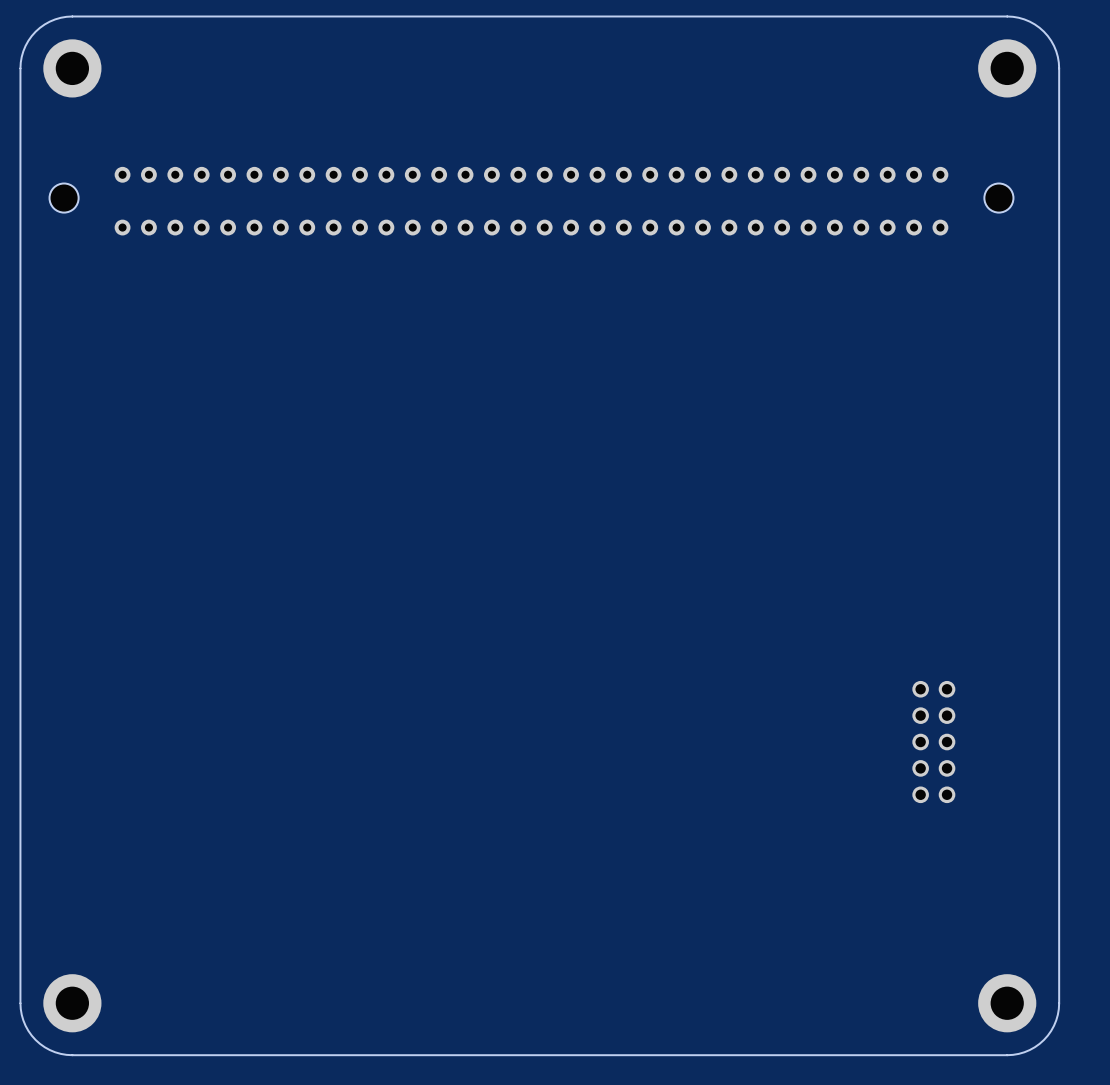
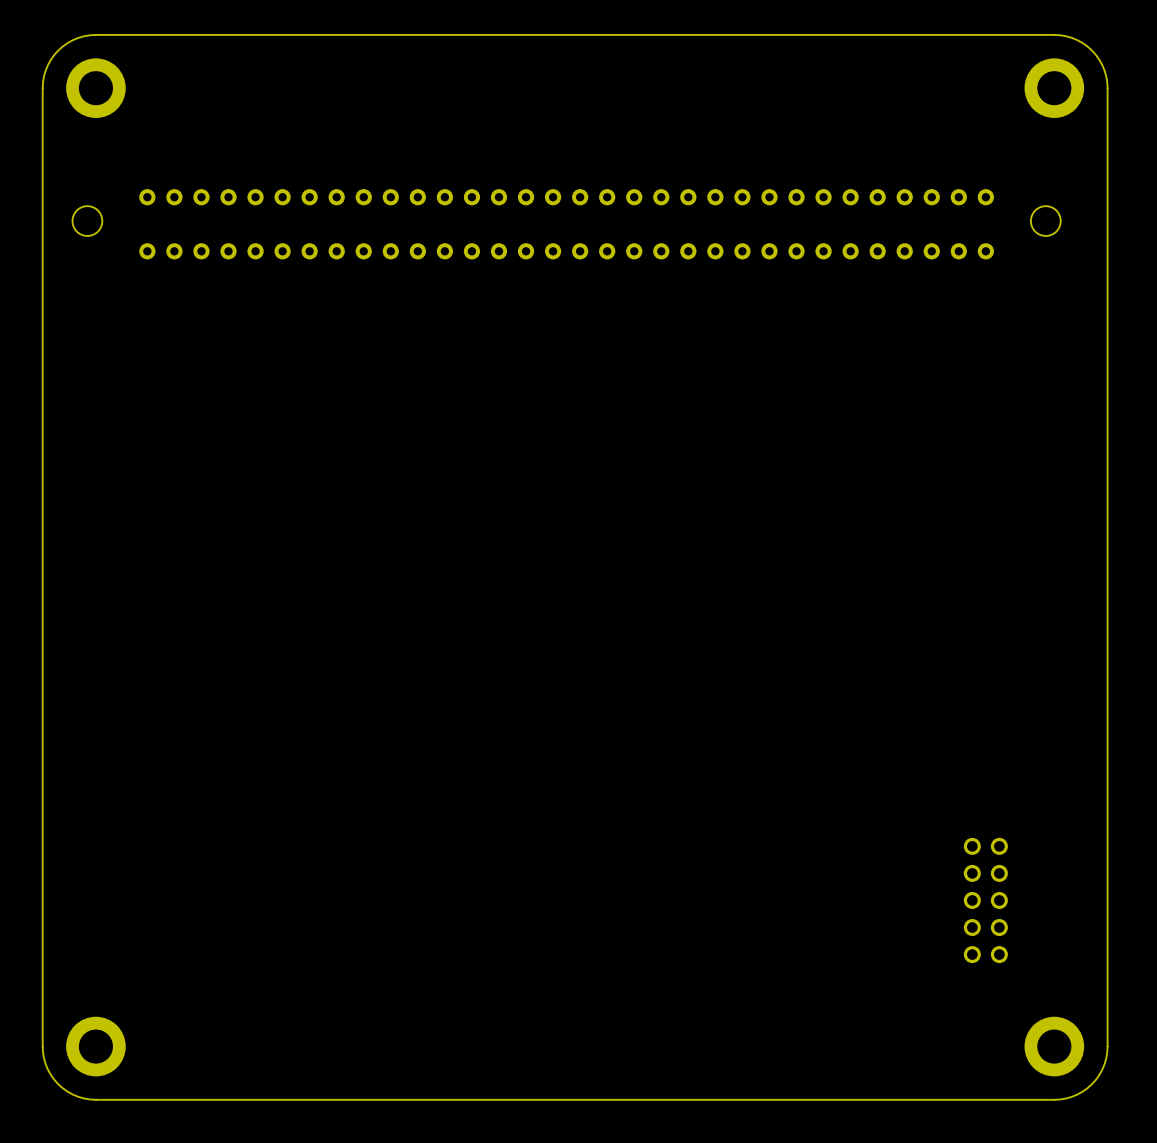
part position: (933, 742) -> (985, 900)

